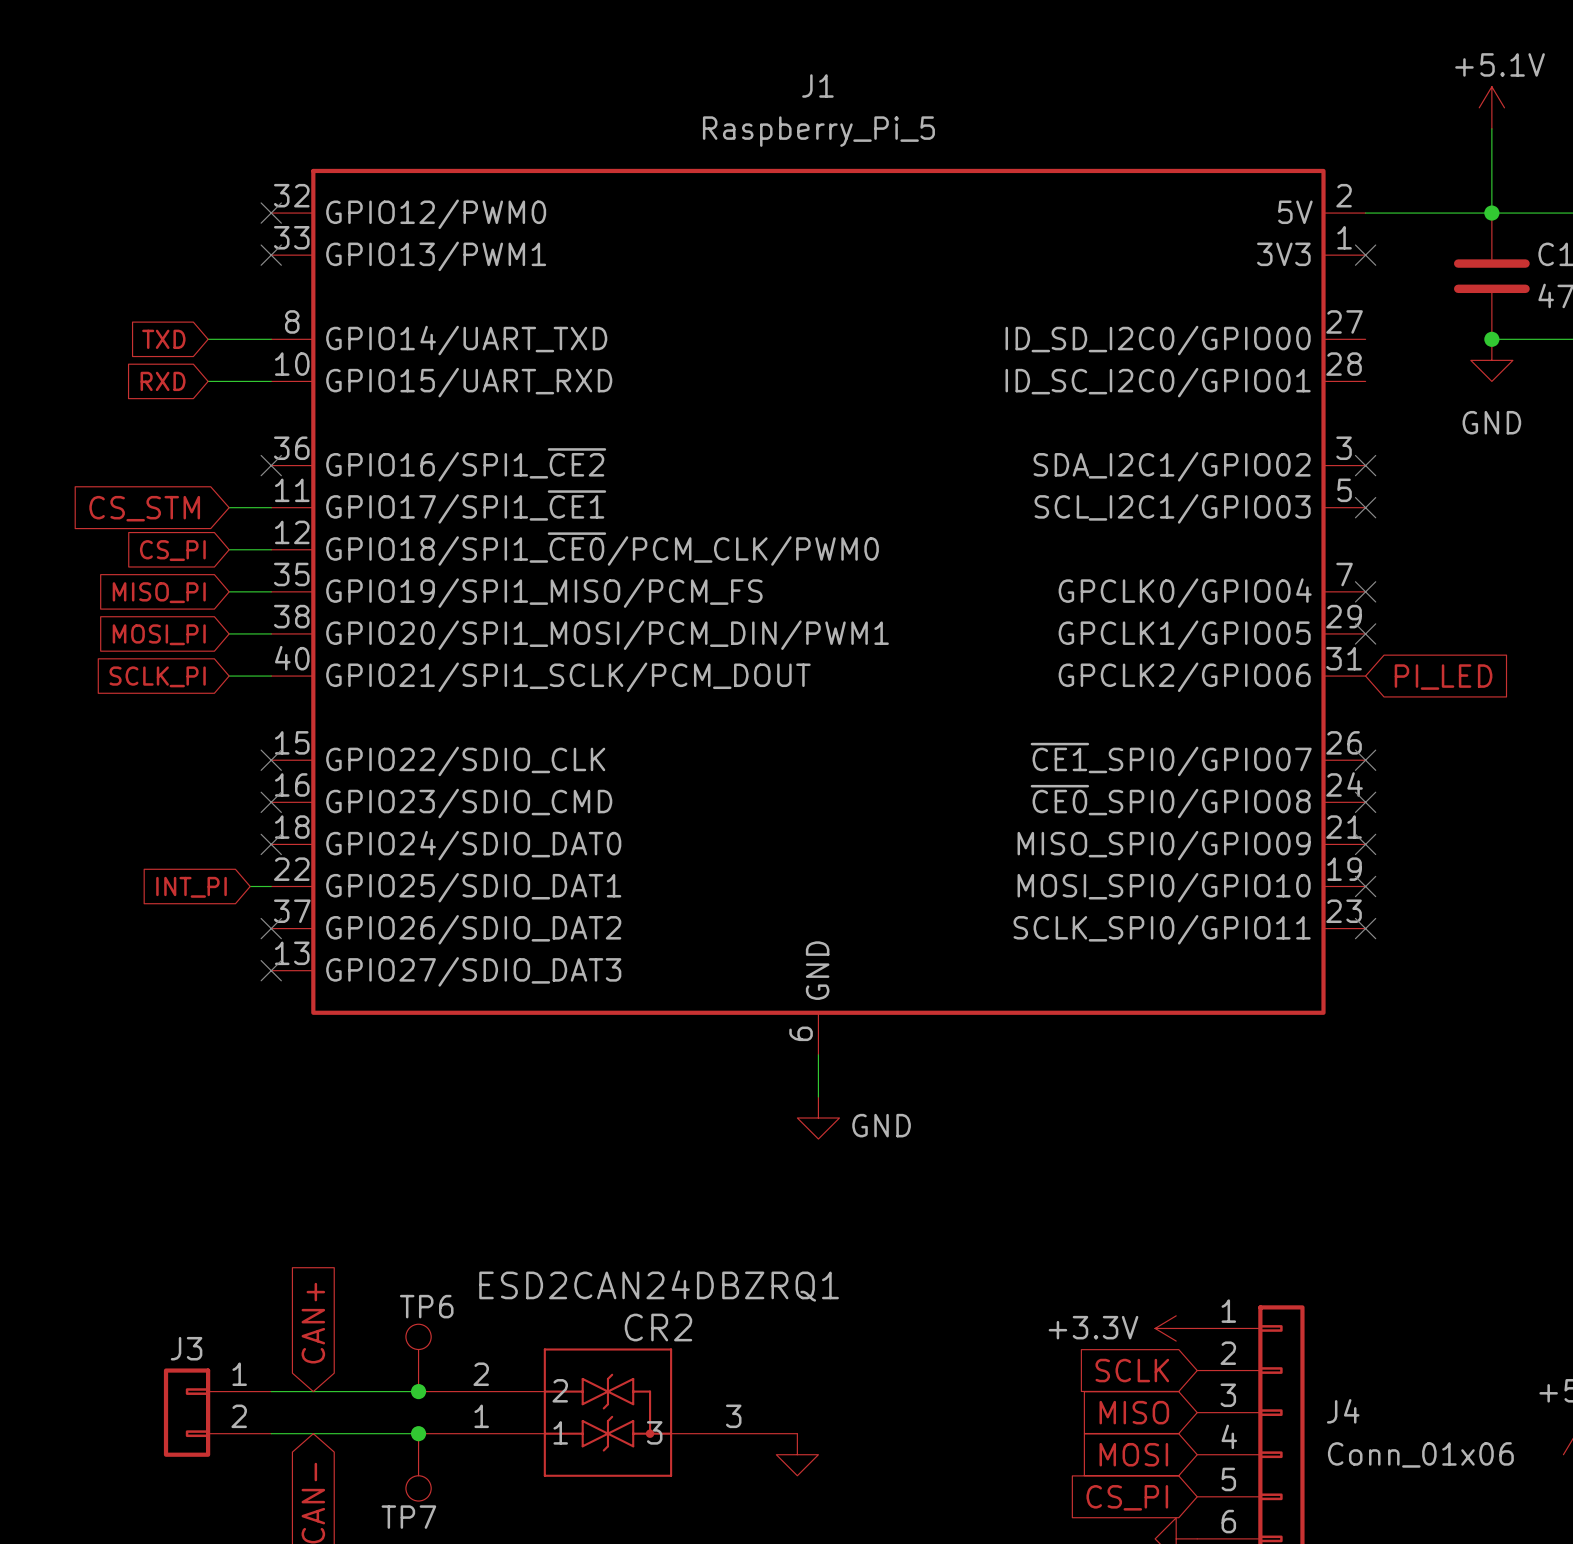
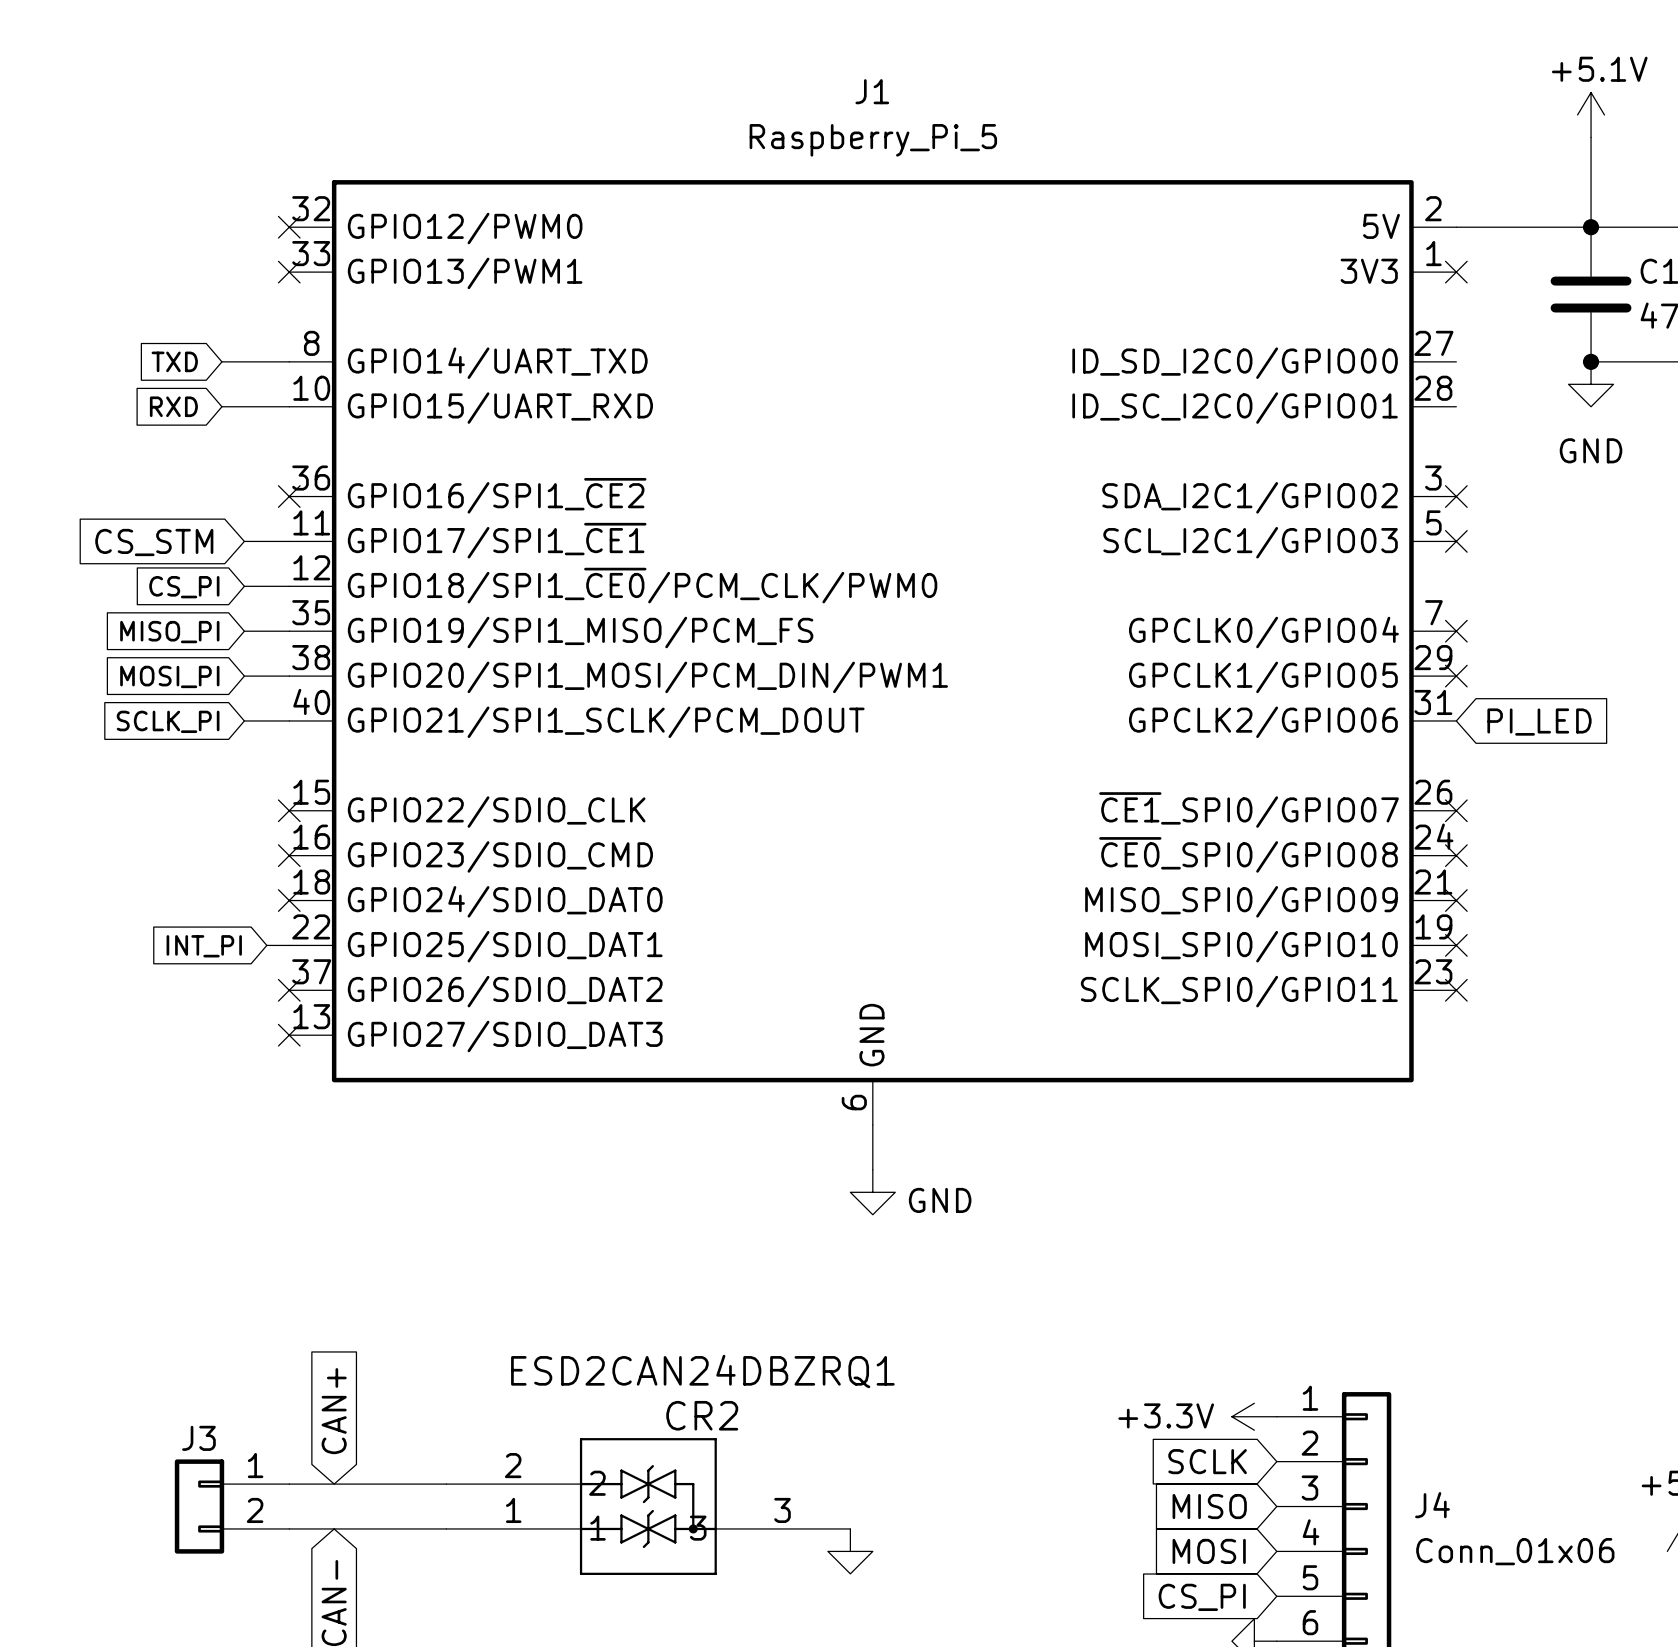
TP6: (418, 1357) -> none
junction: (418, 1391) -> none
junction: (418, 1433) -> none
TP7: (418, 1467) -> none

